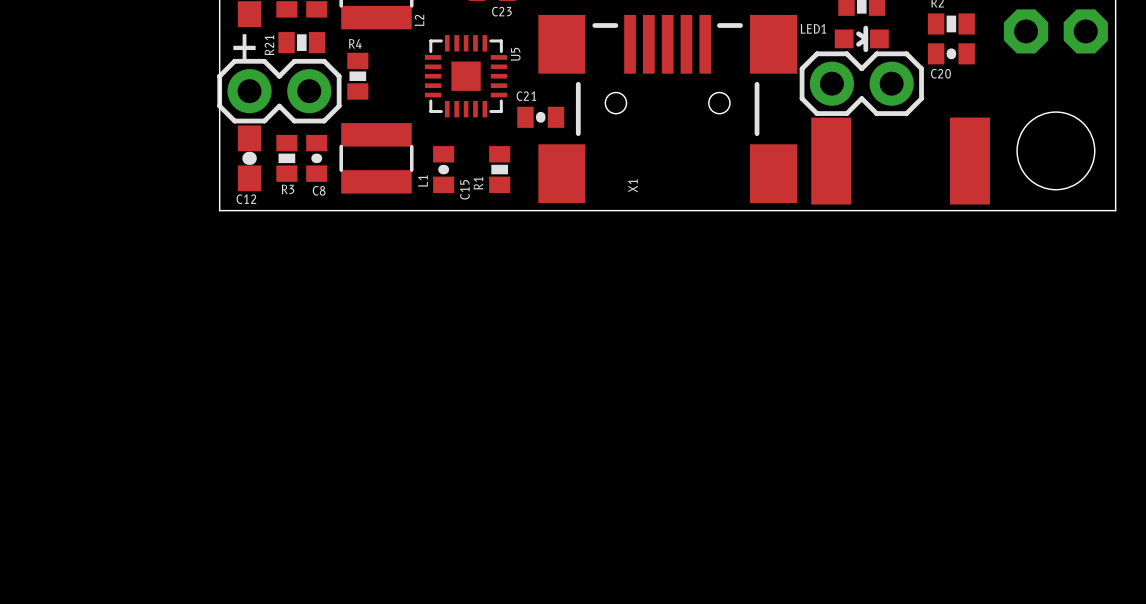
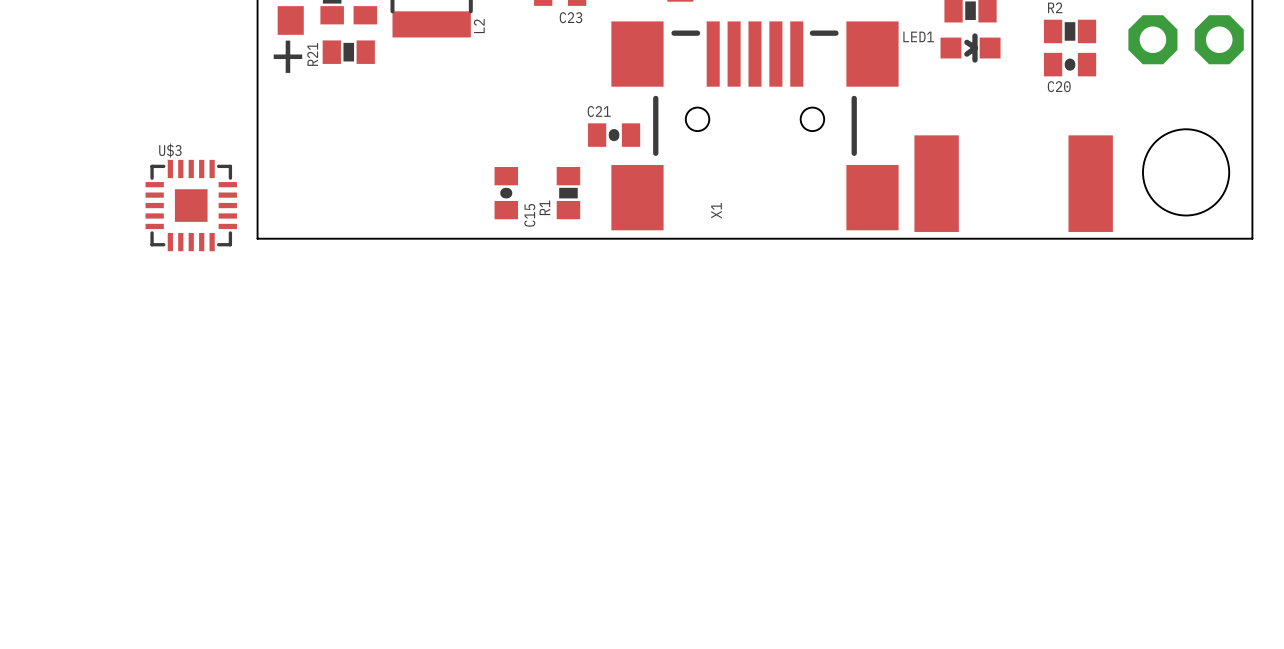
R4: (357, 76) -> none
U5: (466, 76) -> none
part: (861, 83) -> none
part: (279, 91) -> none
C12: (249, 158) -> none
R3: (286, 158) -> none
C8: (316, 158) -> none
L1: (376, 158) -> none
U$3: none -> (191, 205)

